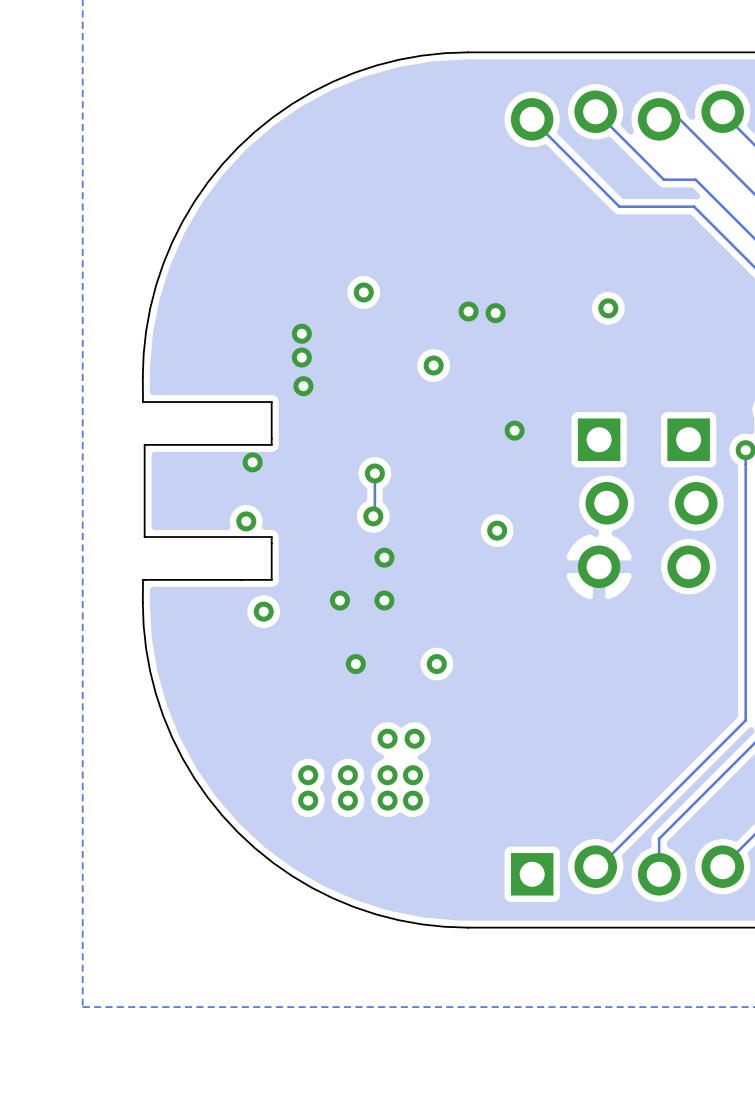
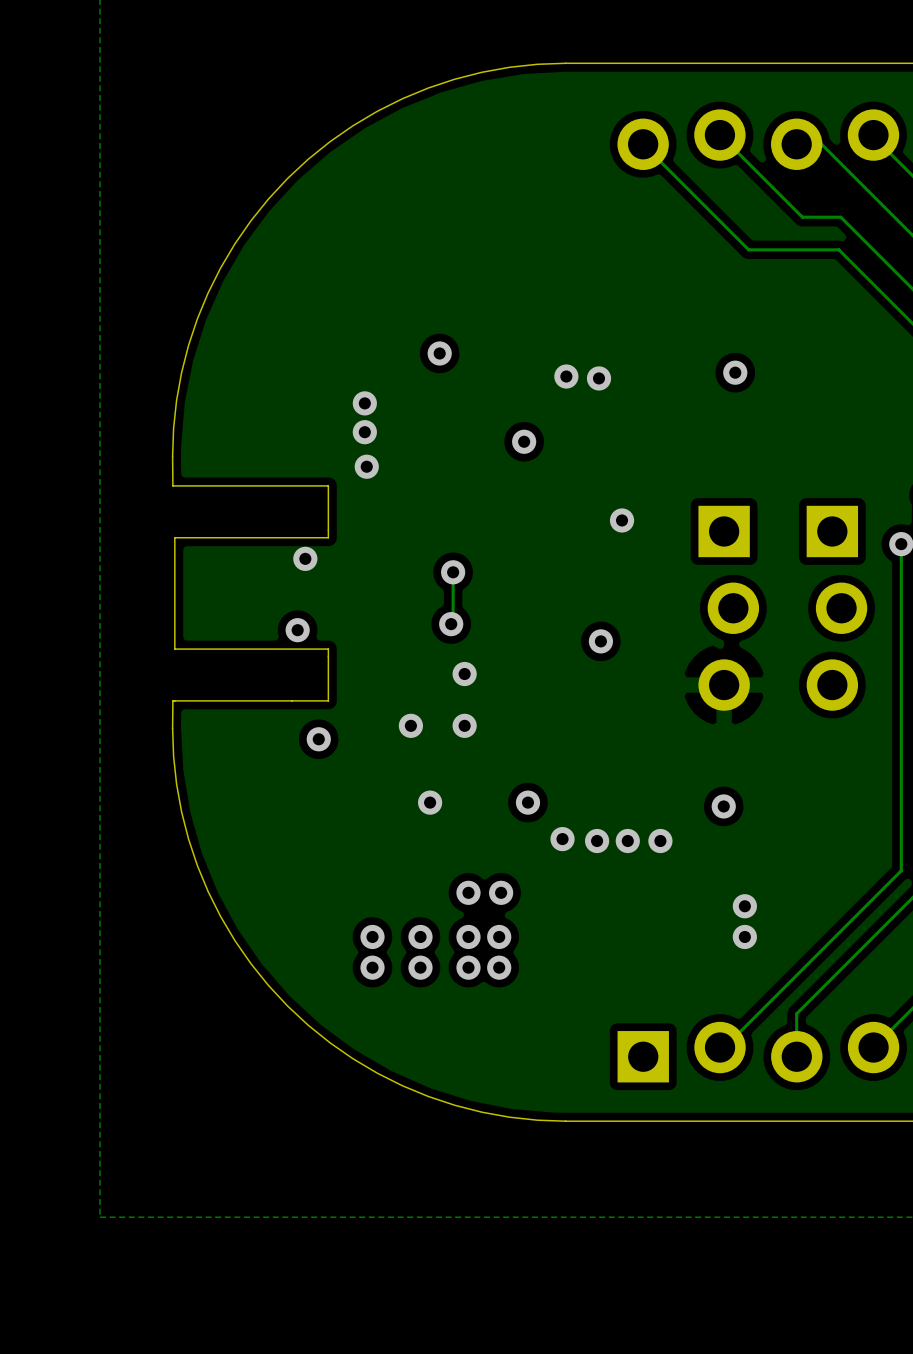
via: none -> (723, 806)
via: none -> (562, 839)
via: none -> (597, 841)
via: none -> (627, 841)
via: none -> (660, 841)
via: none -> (744, 906)
via: none -> (744, 936)

